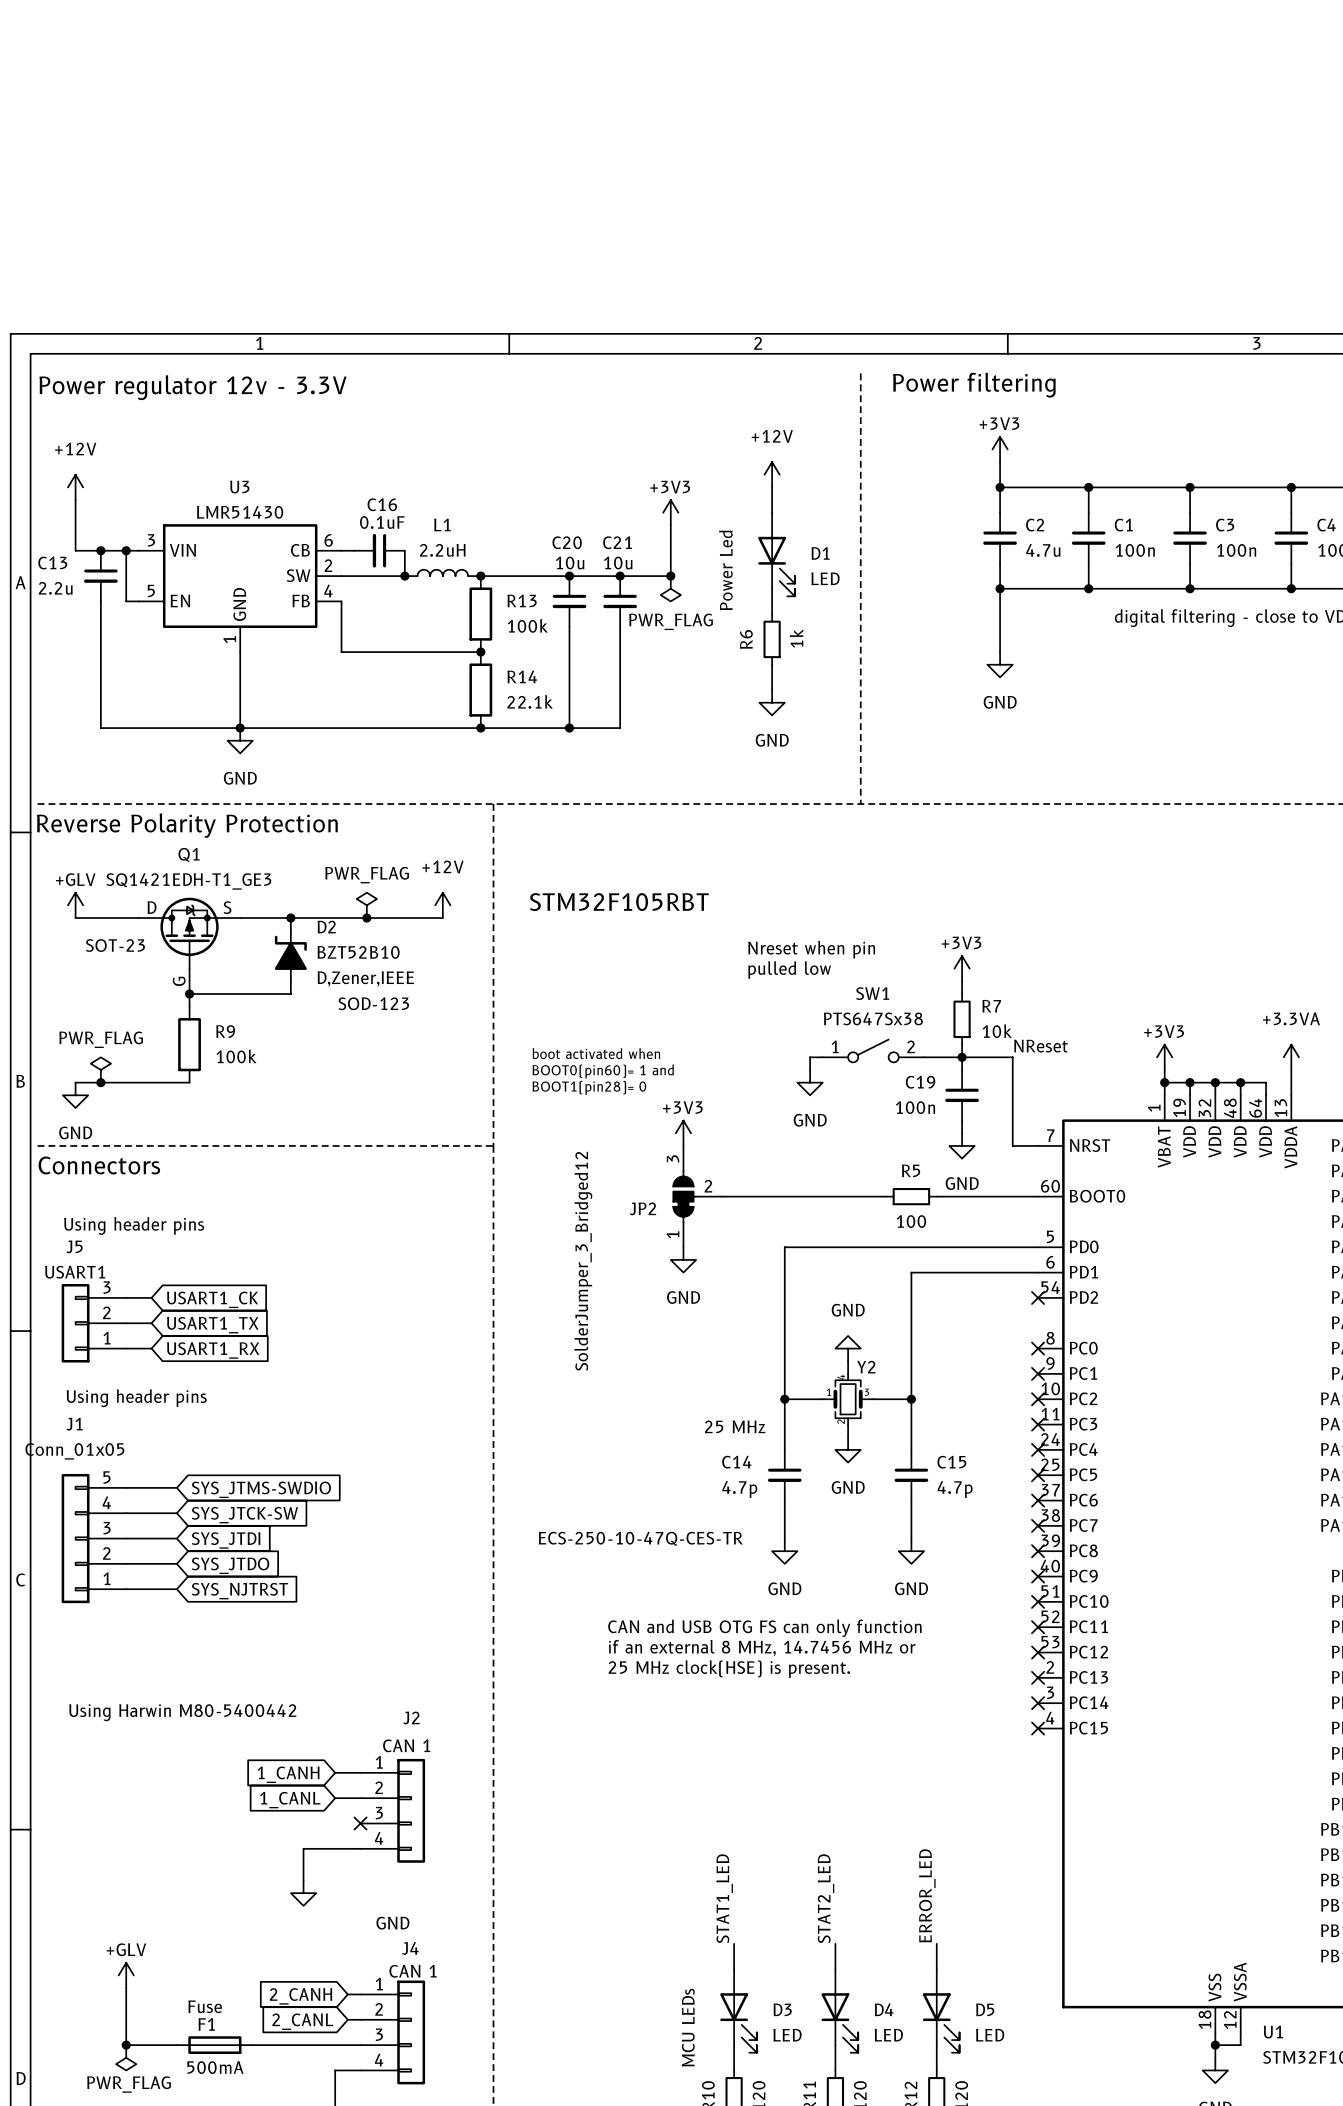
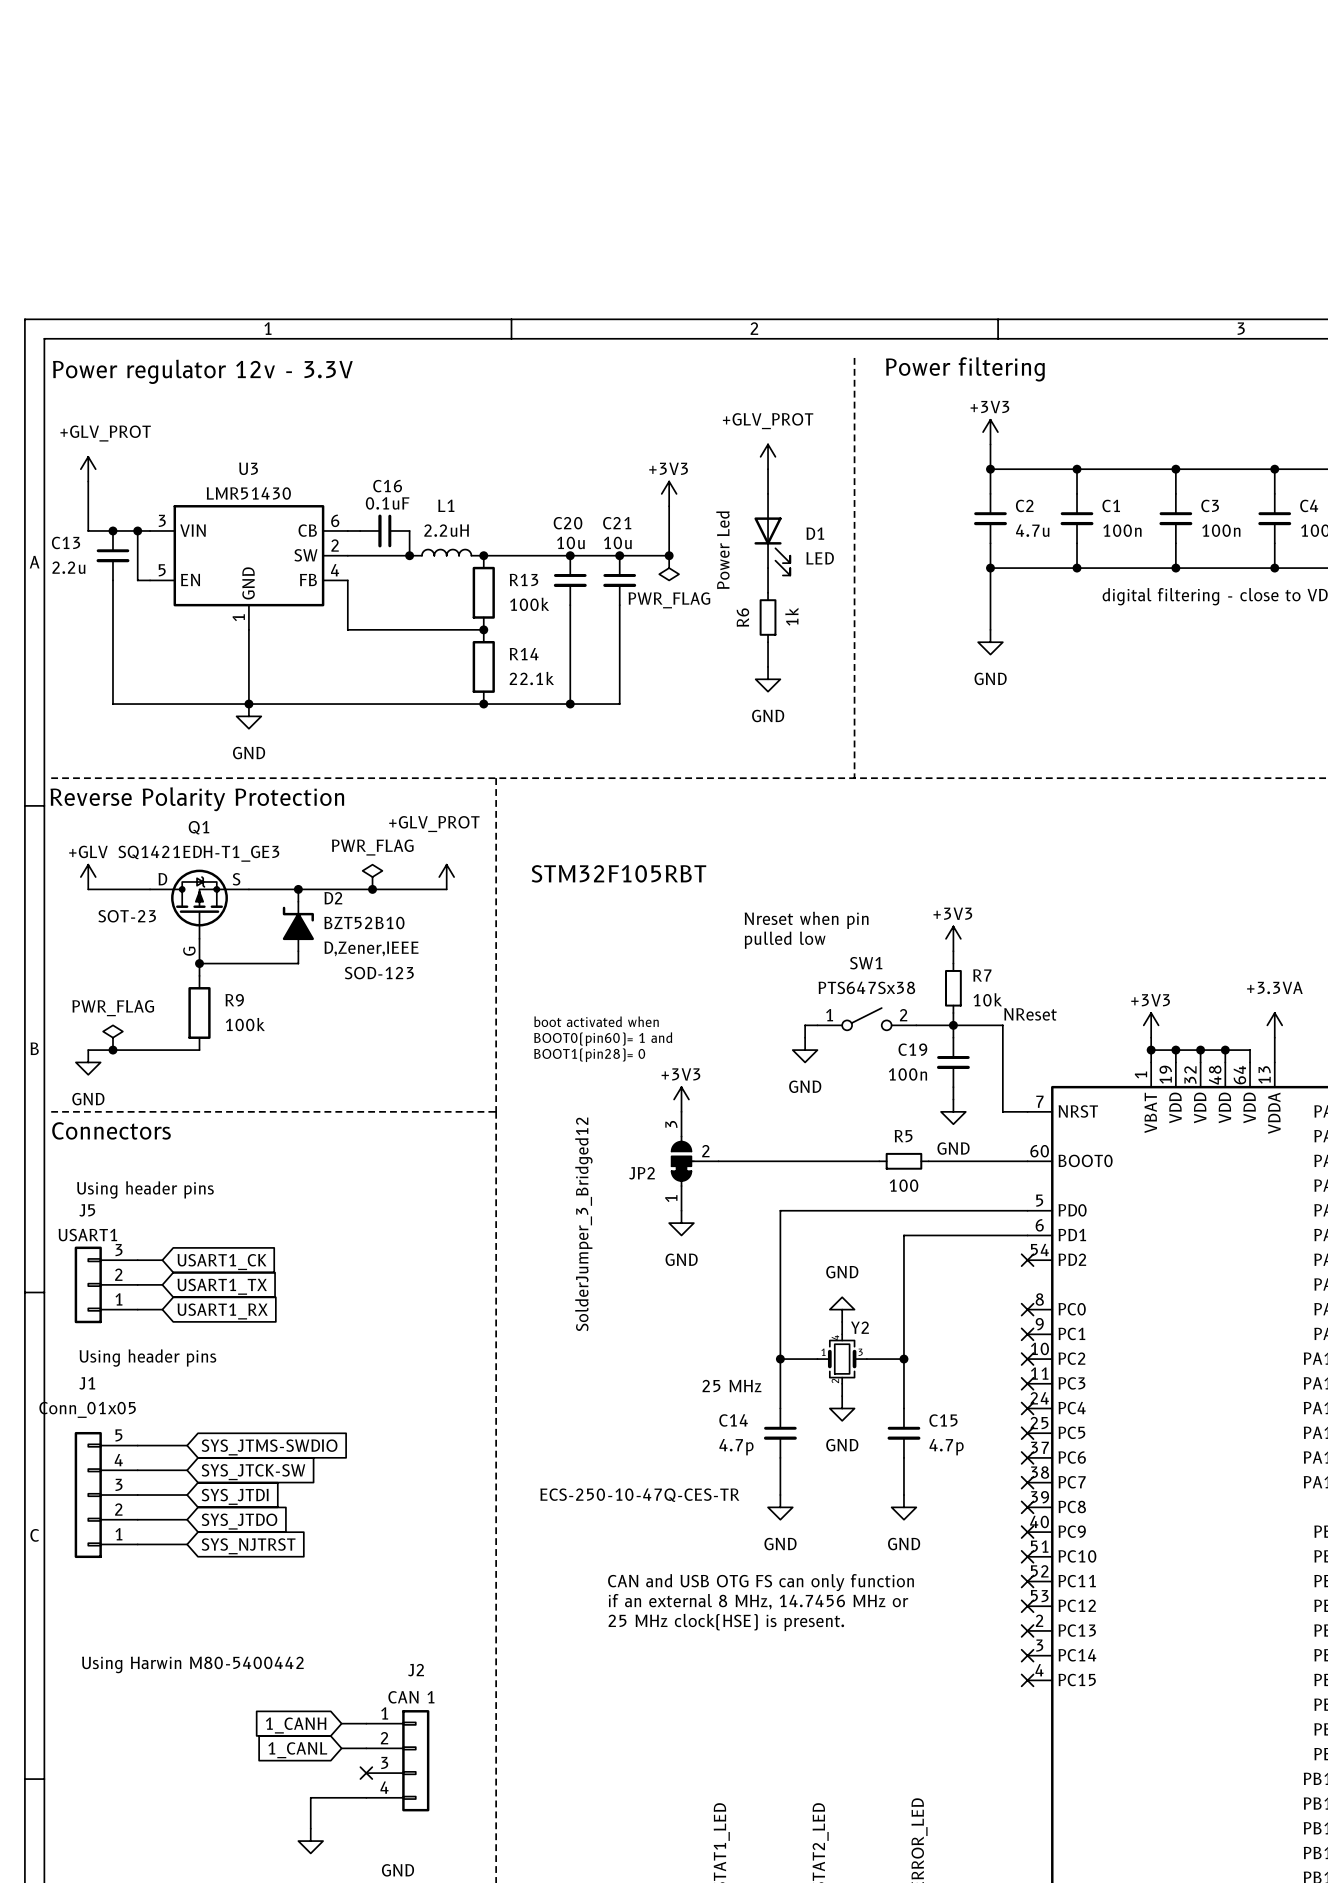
power symbol: +12V (772, 474) -> +GLV_PROT (768, 456)
power symbol: +12V (75, 487) -> +GLV_PROT (88, 469)
power symbol: +12V (442, 905) -> +GLV_PROT (446, 877)

